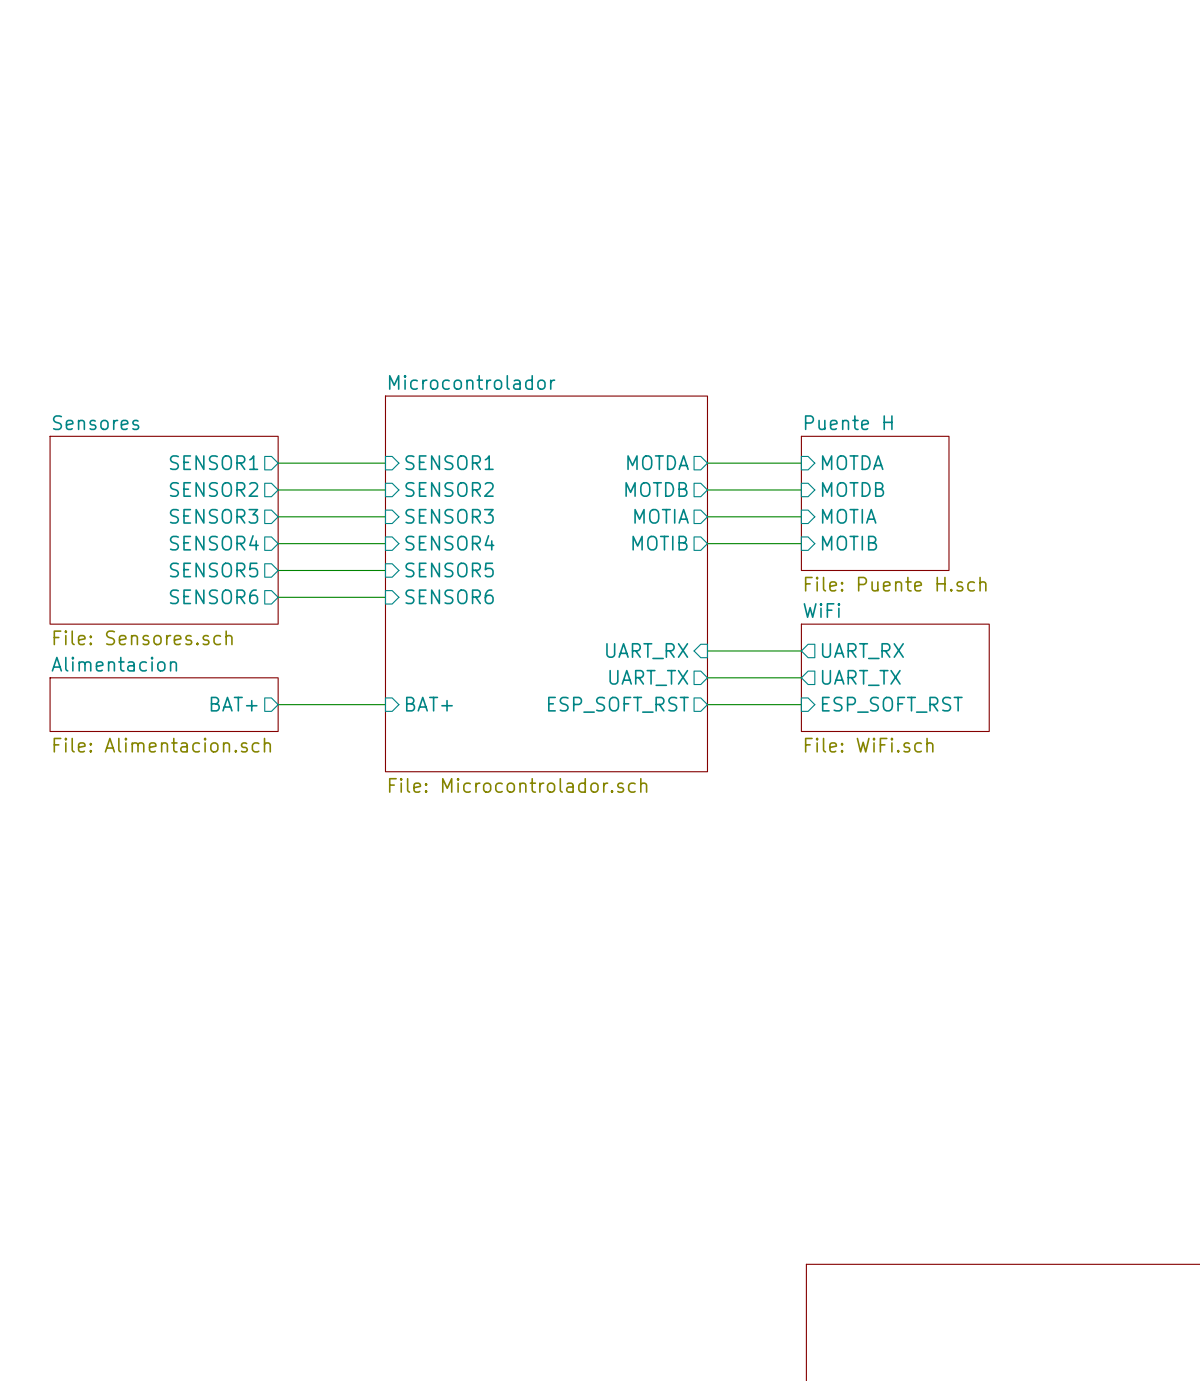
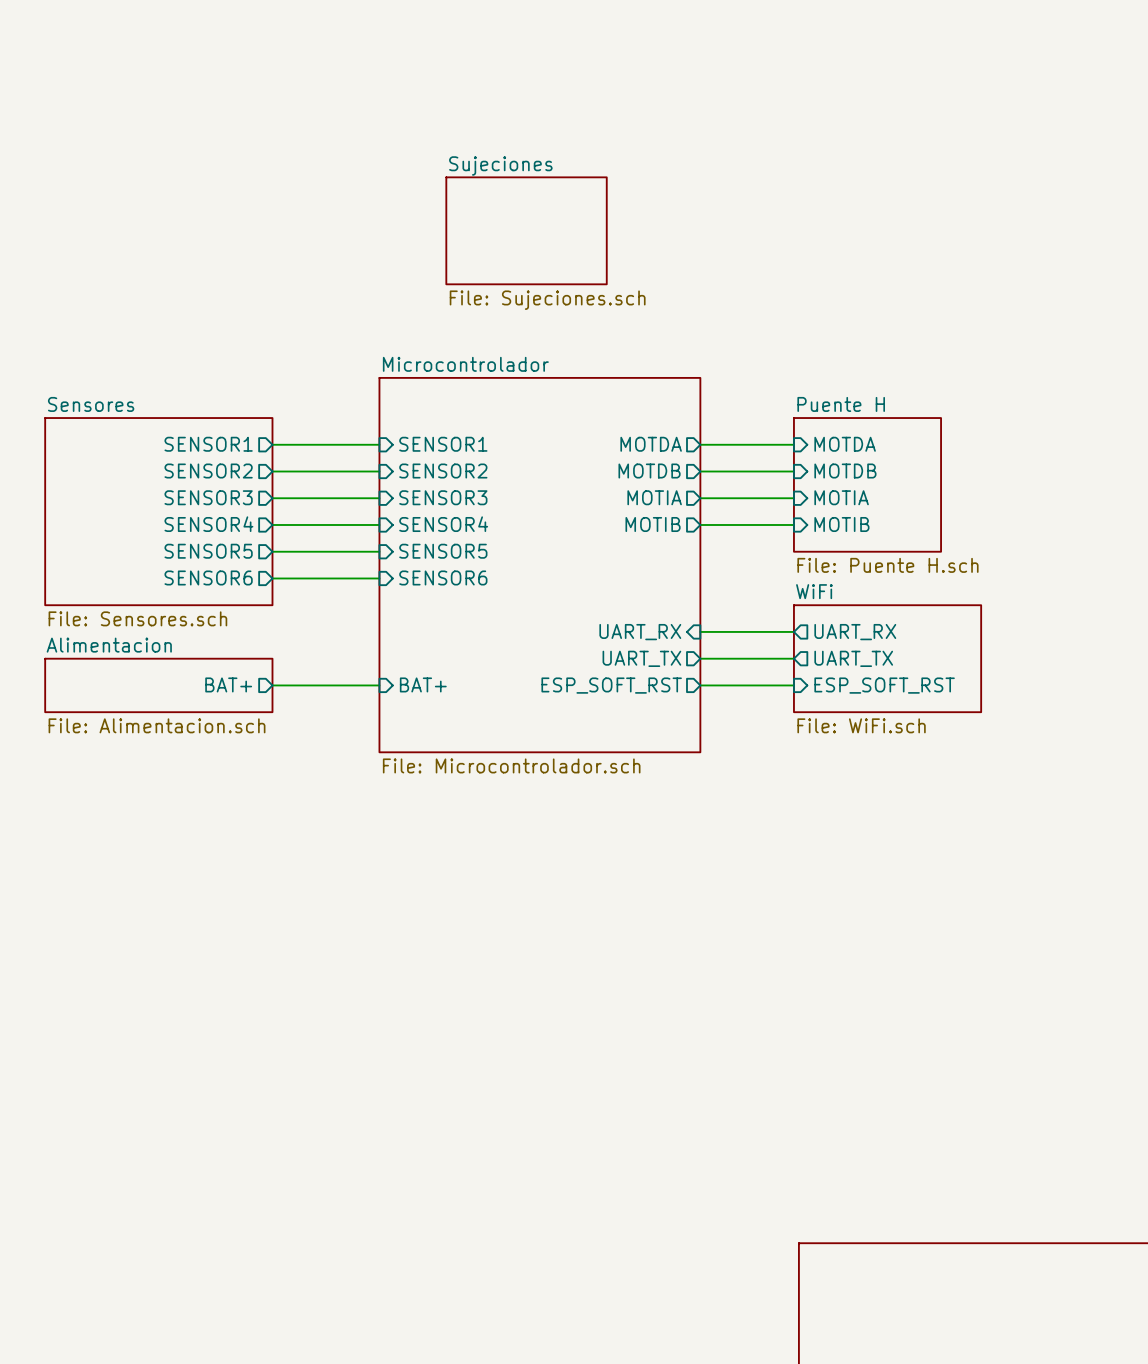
sheet Sujeciones: none -> File: Sujeciones.sch (526, 230)

